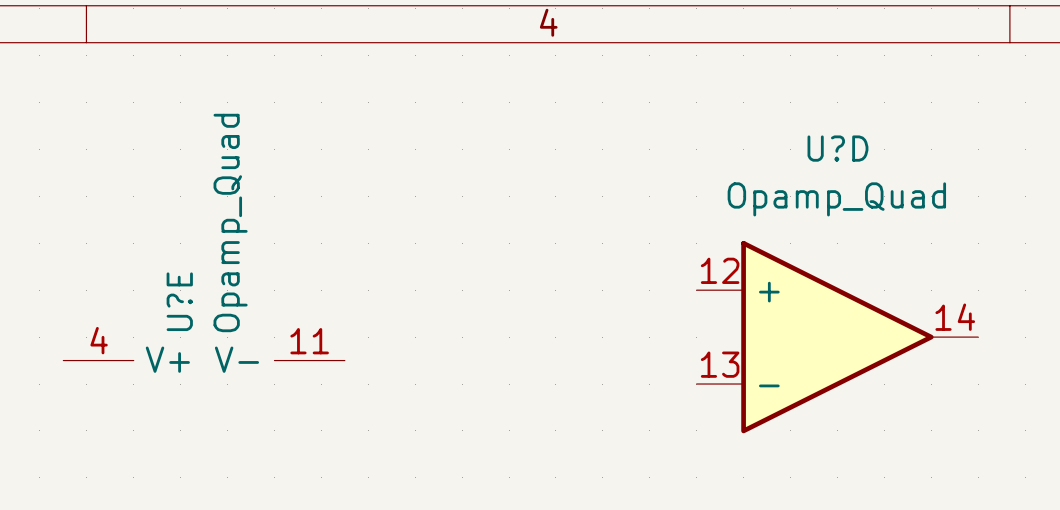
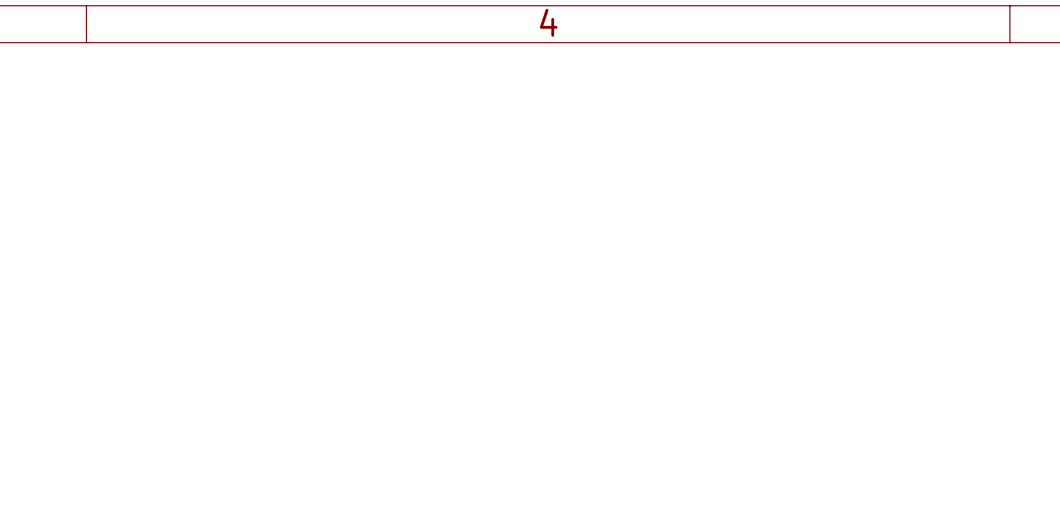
U?D: Opamp_Quad (837, 337) -> none
U?E: Opamp_Quad (204, 360) -> none

